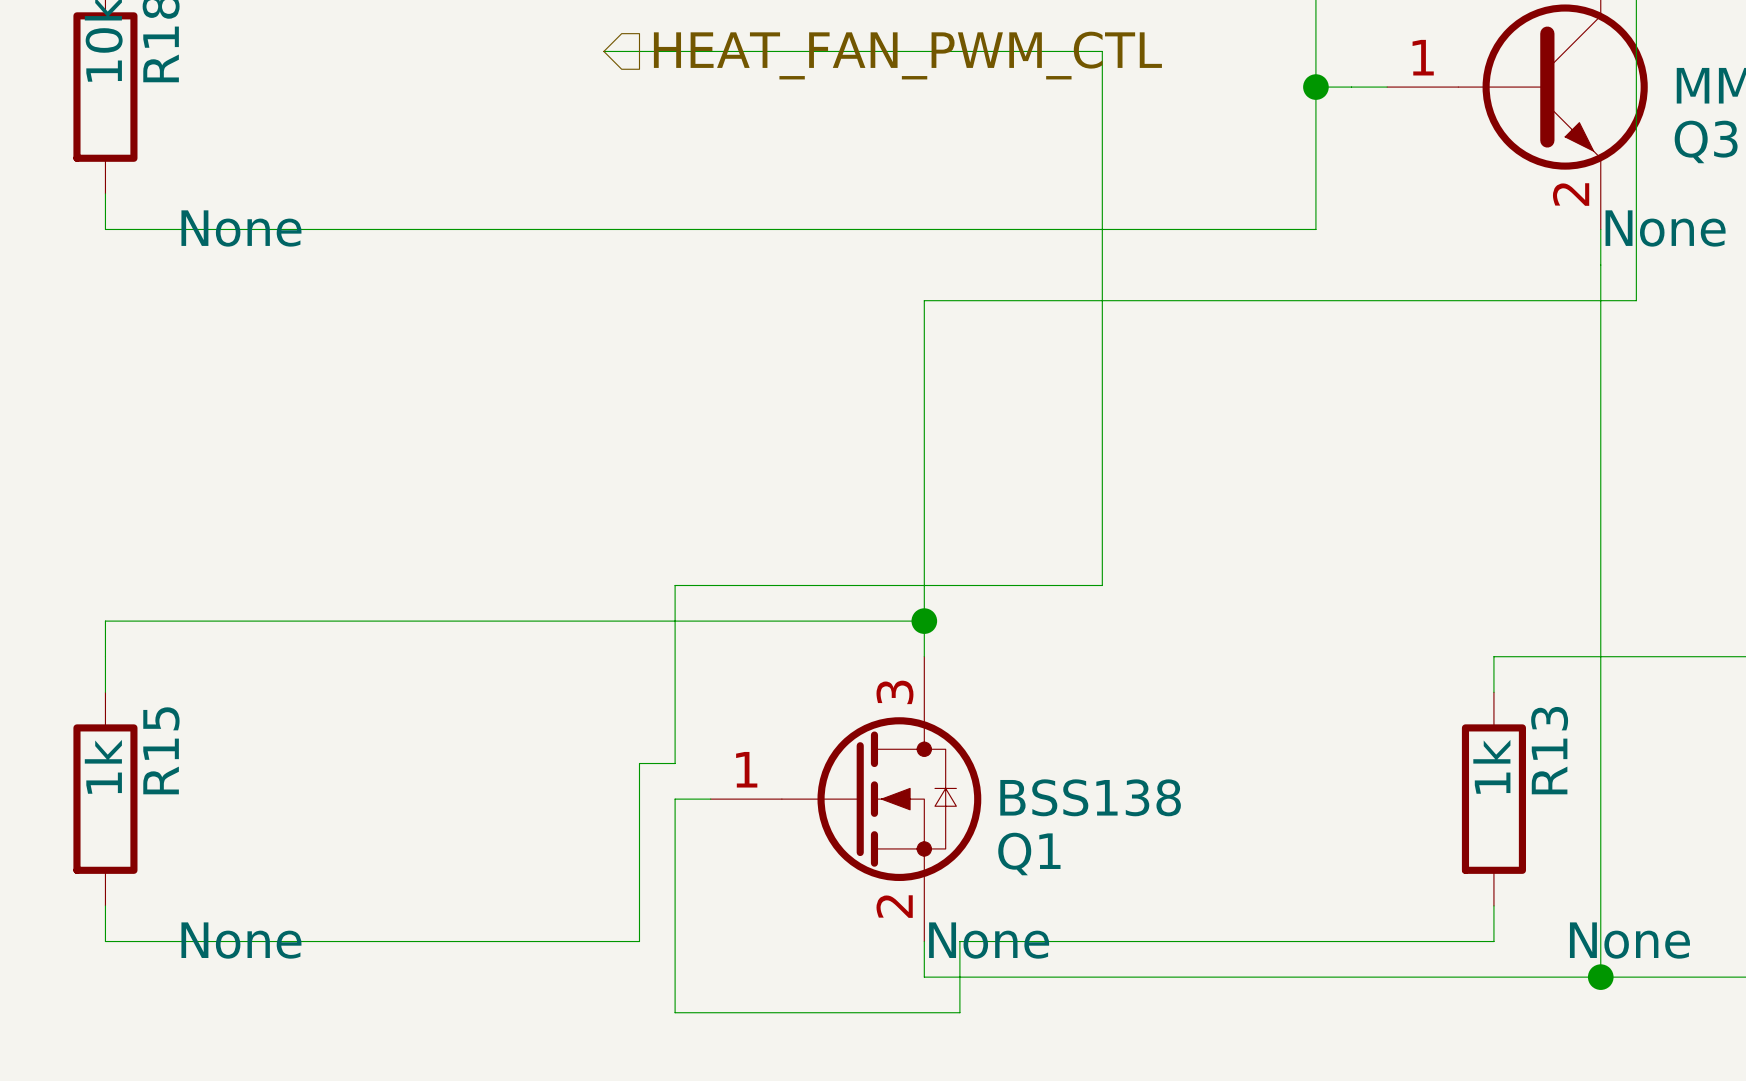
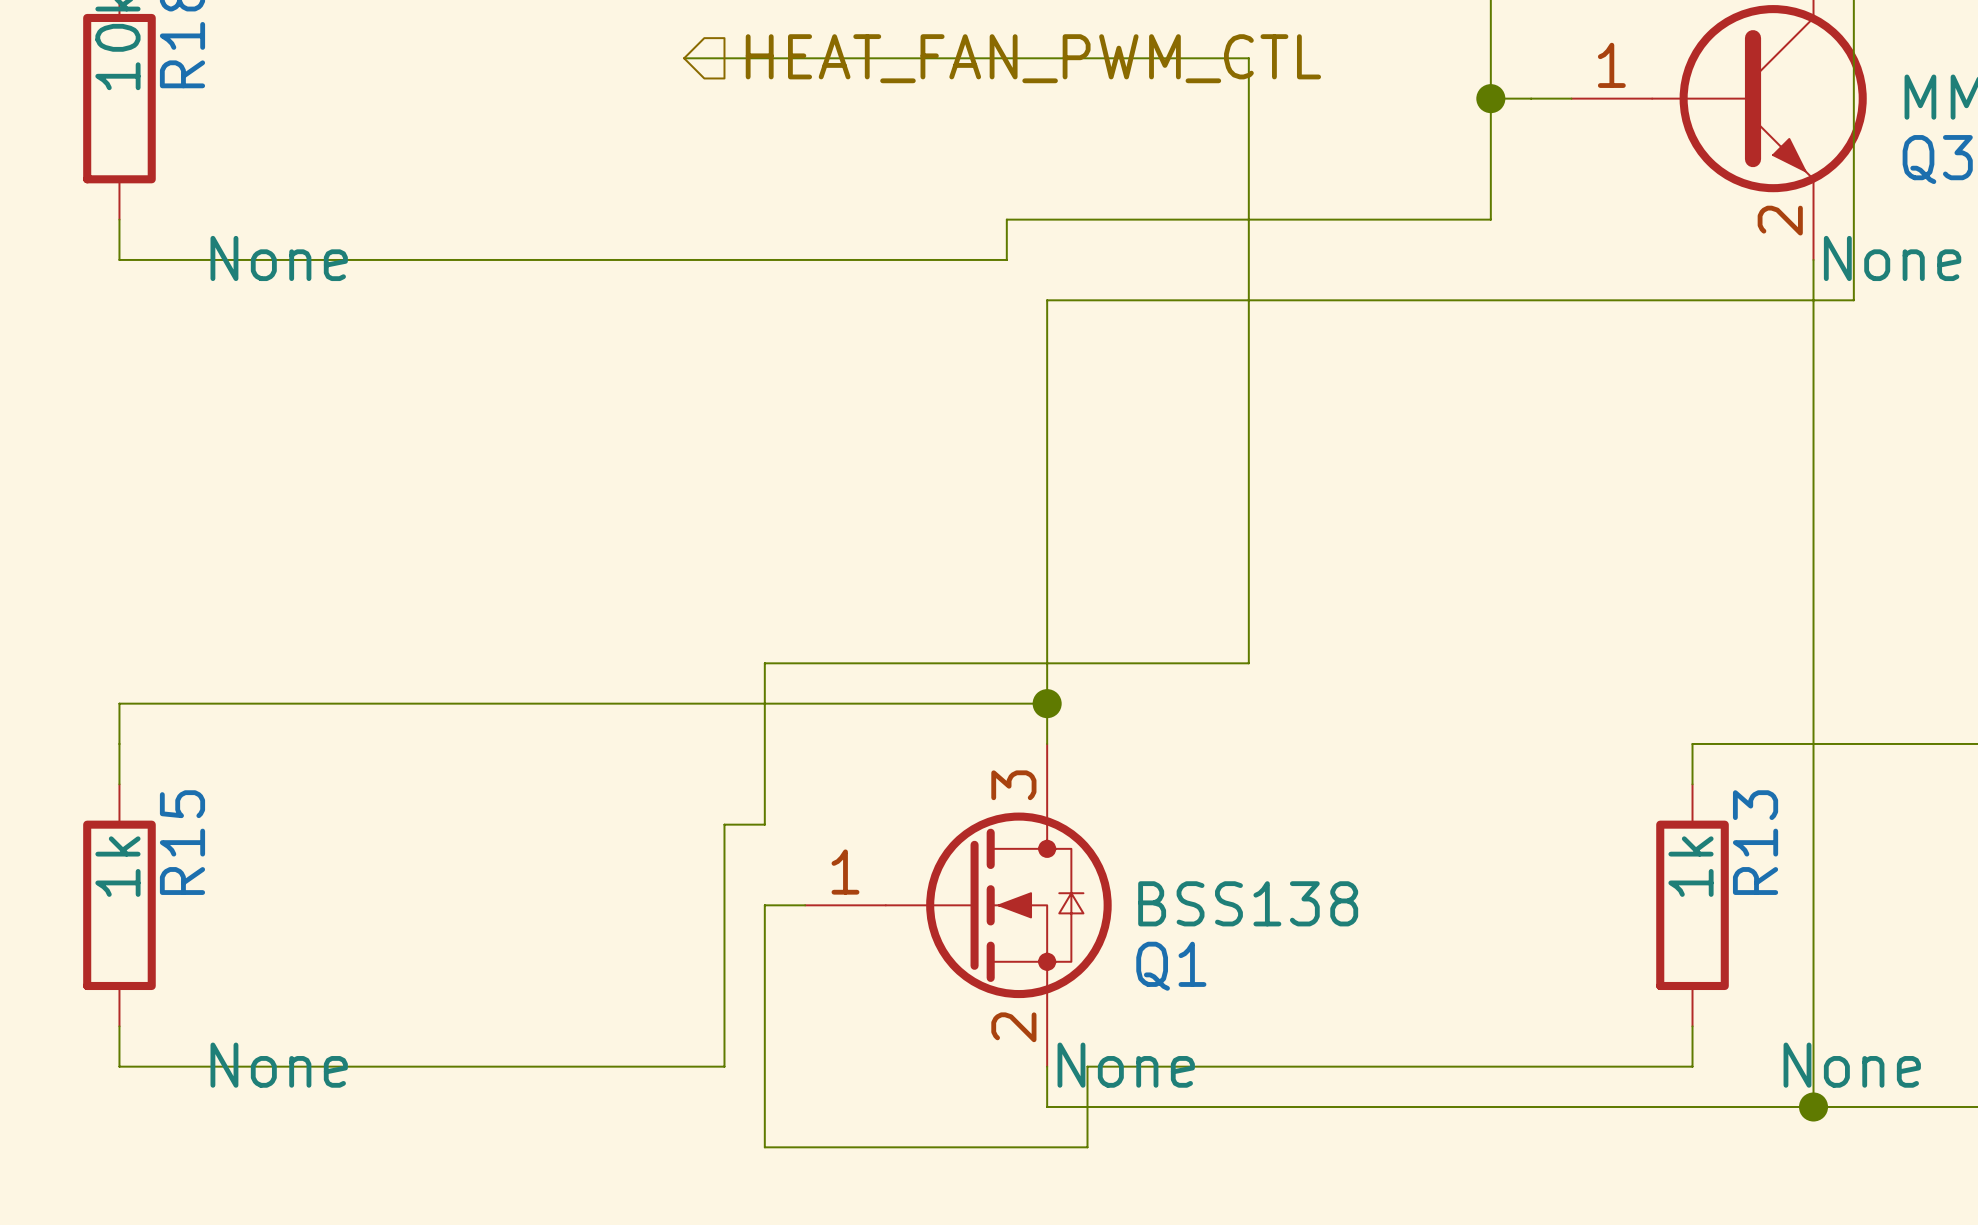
wire: (1315, 193) (1315, 229) (888, 229) -> (1490, 219) (1006, 219) (1006, 259)
wire: (1636, 265) (1636, 300) (924, 300) -> (1853, 300) (1047, 300) (1047, 340)
wire: (675, 727) (675, 763) (639, 763) -> (764, 824) (724, 824) (724, 864)

